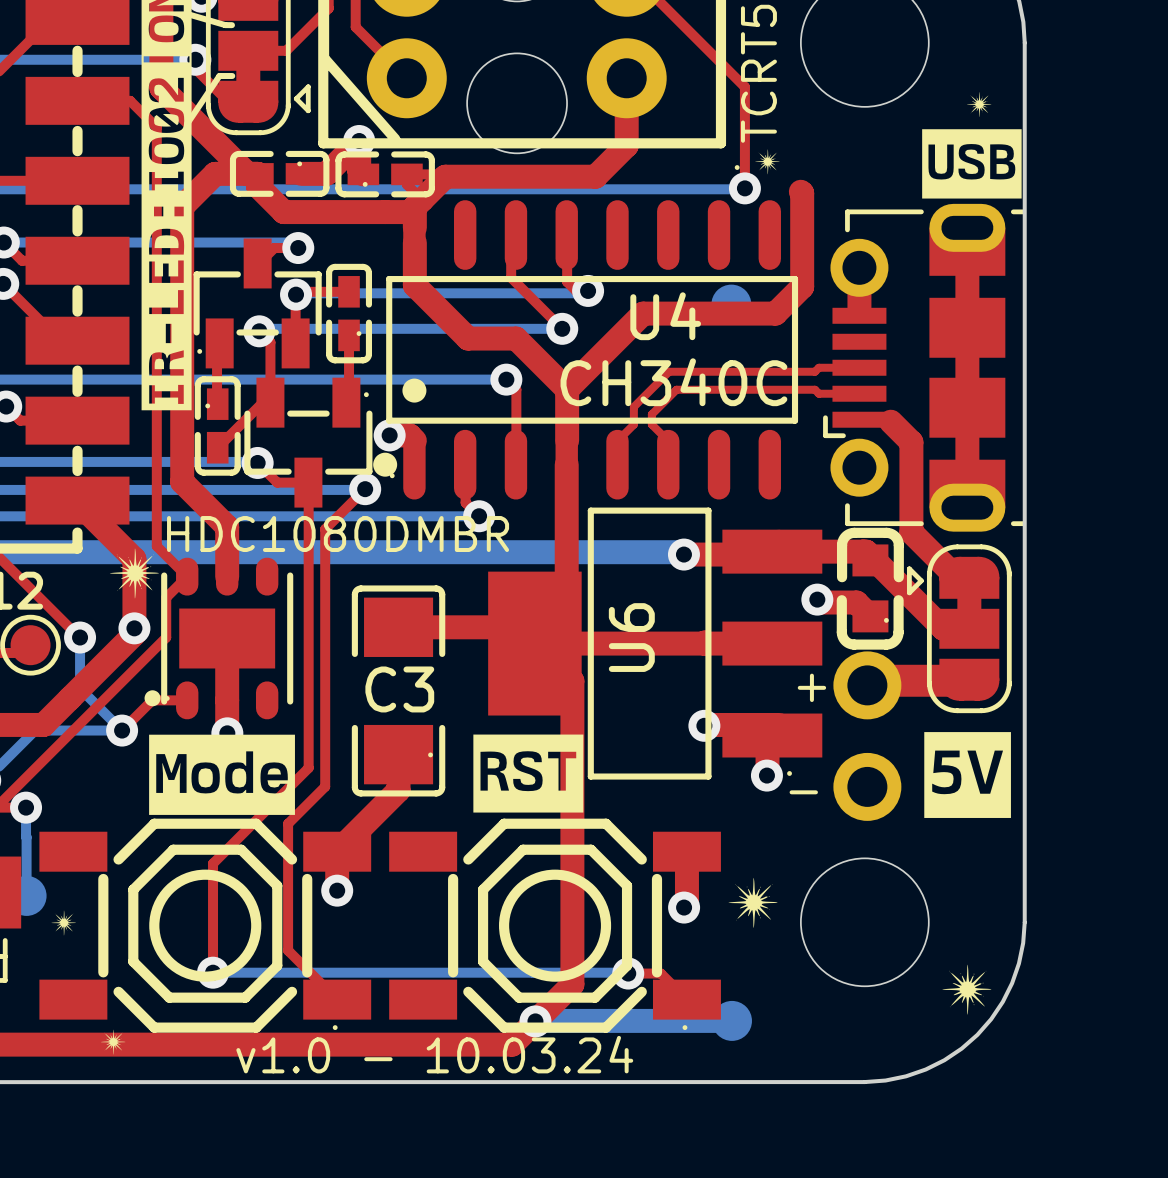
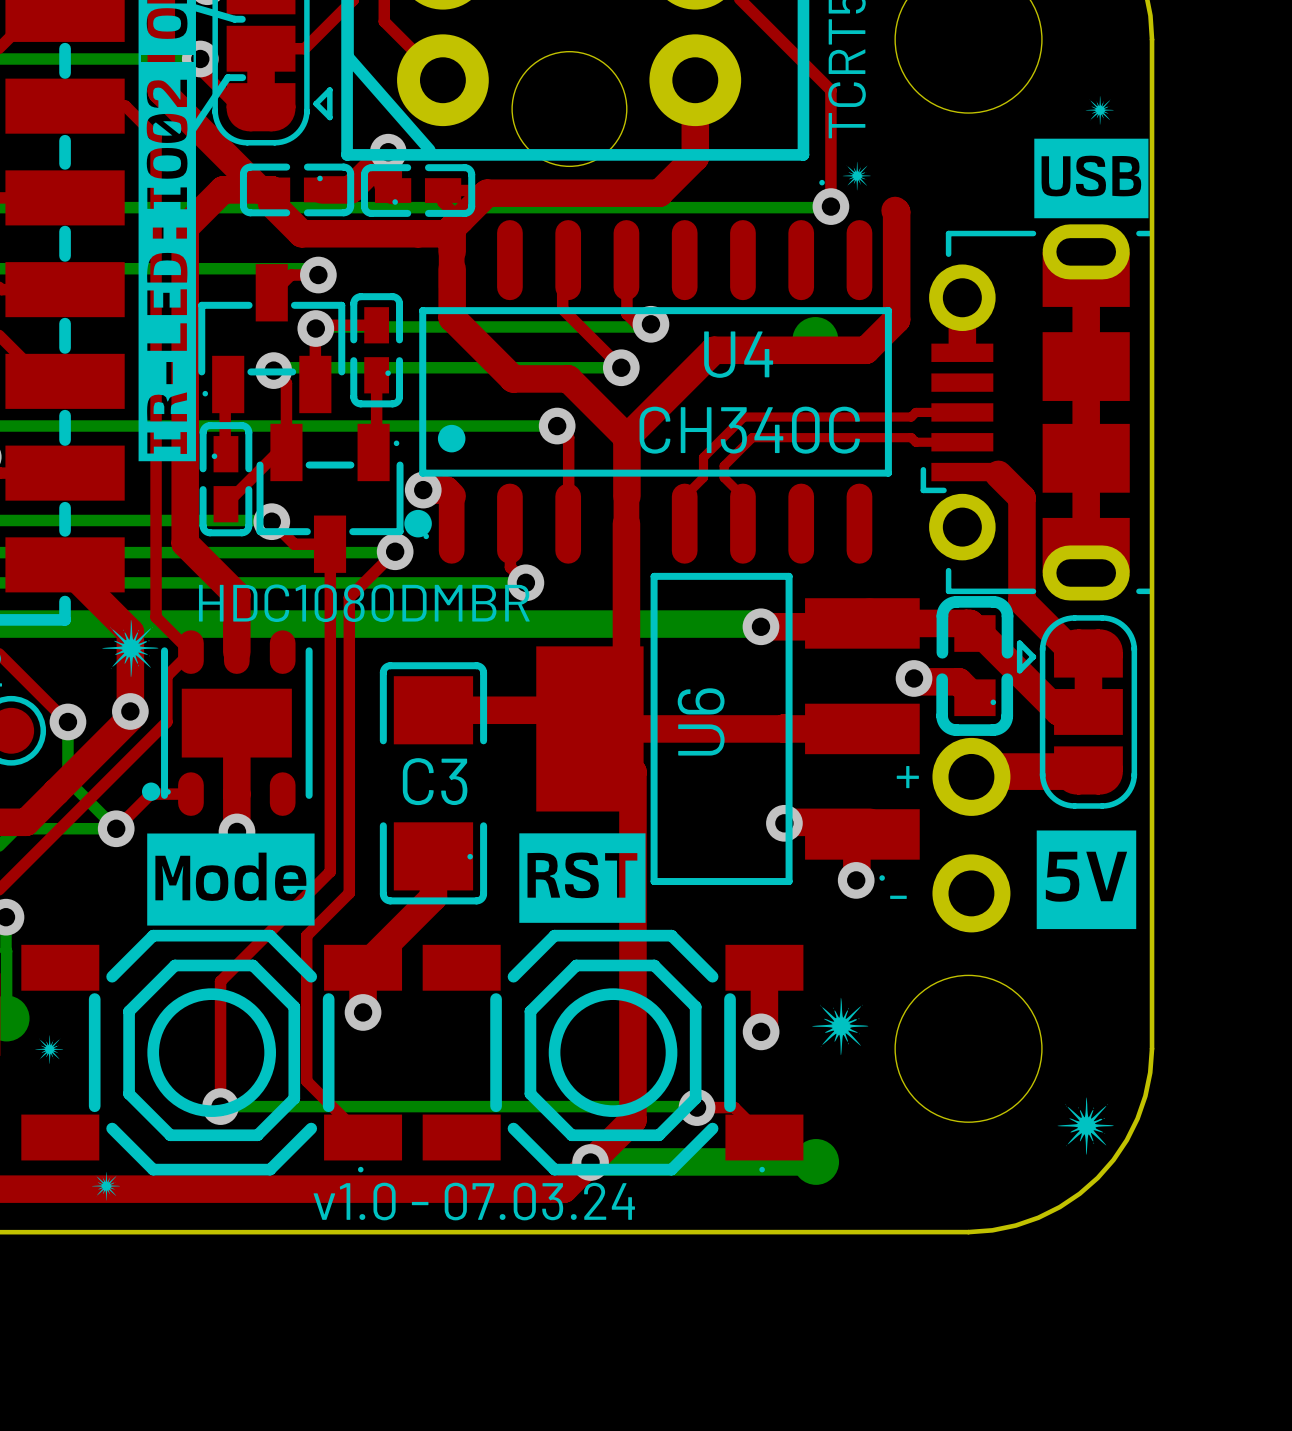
text: v1.0 - 10.03.24 (434, 1054) -> v1.0 - 07.03.24 (474, 1201)

